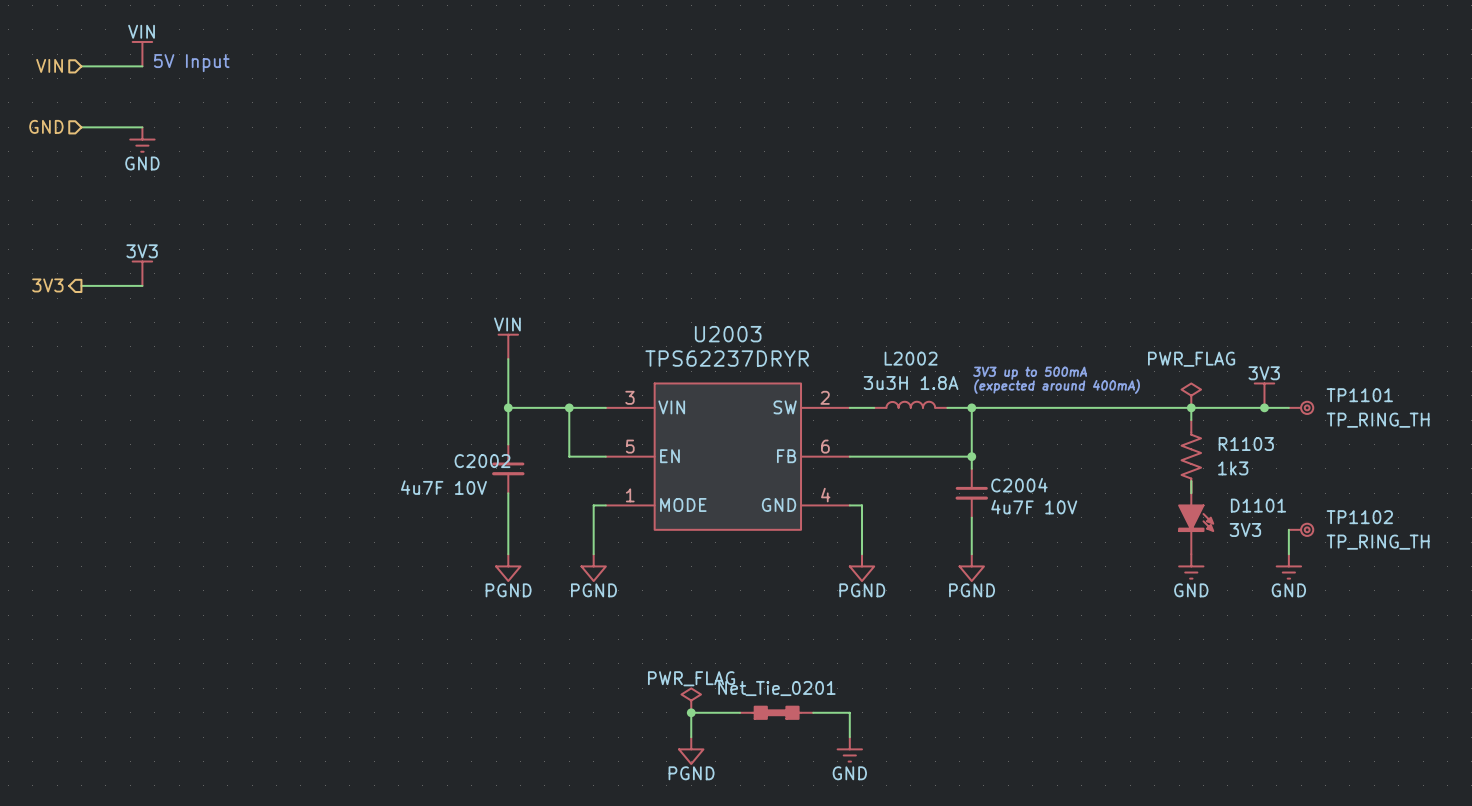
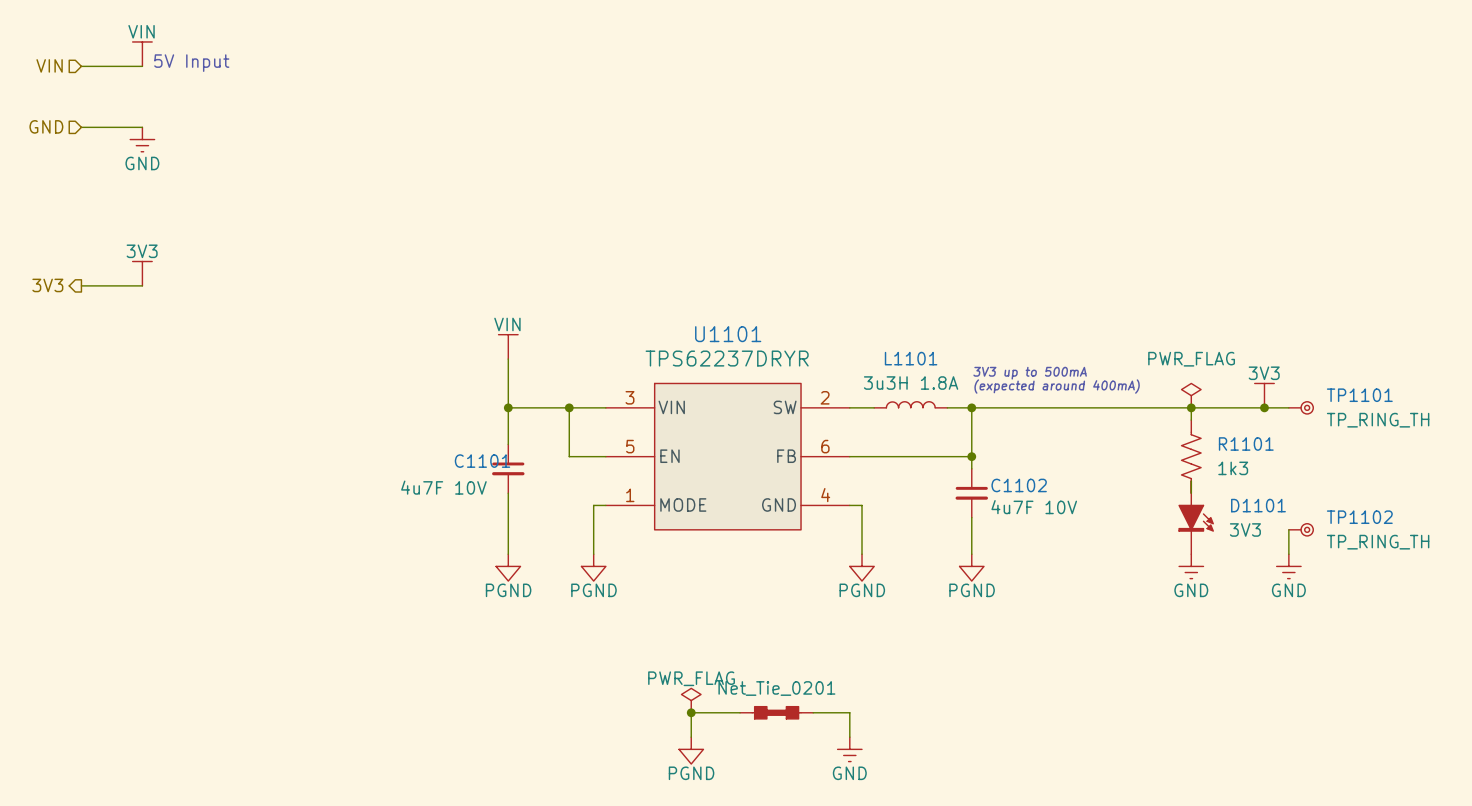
U2003 name: U2003 (728, 334) -> U1101 (728, 334)
L2002 name: L2002 (911, 358) -> L1101 (911, 358)
R1103 name: R1103 (1246, 444) -> R1101 (1246, 444)
C2002 name: C2002 (482, 461) -> C1101 (482, 461)
C2004 name: C2004 (1019, 485) -> C1102 (1019, 485)

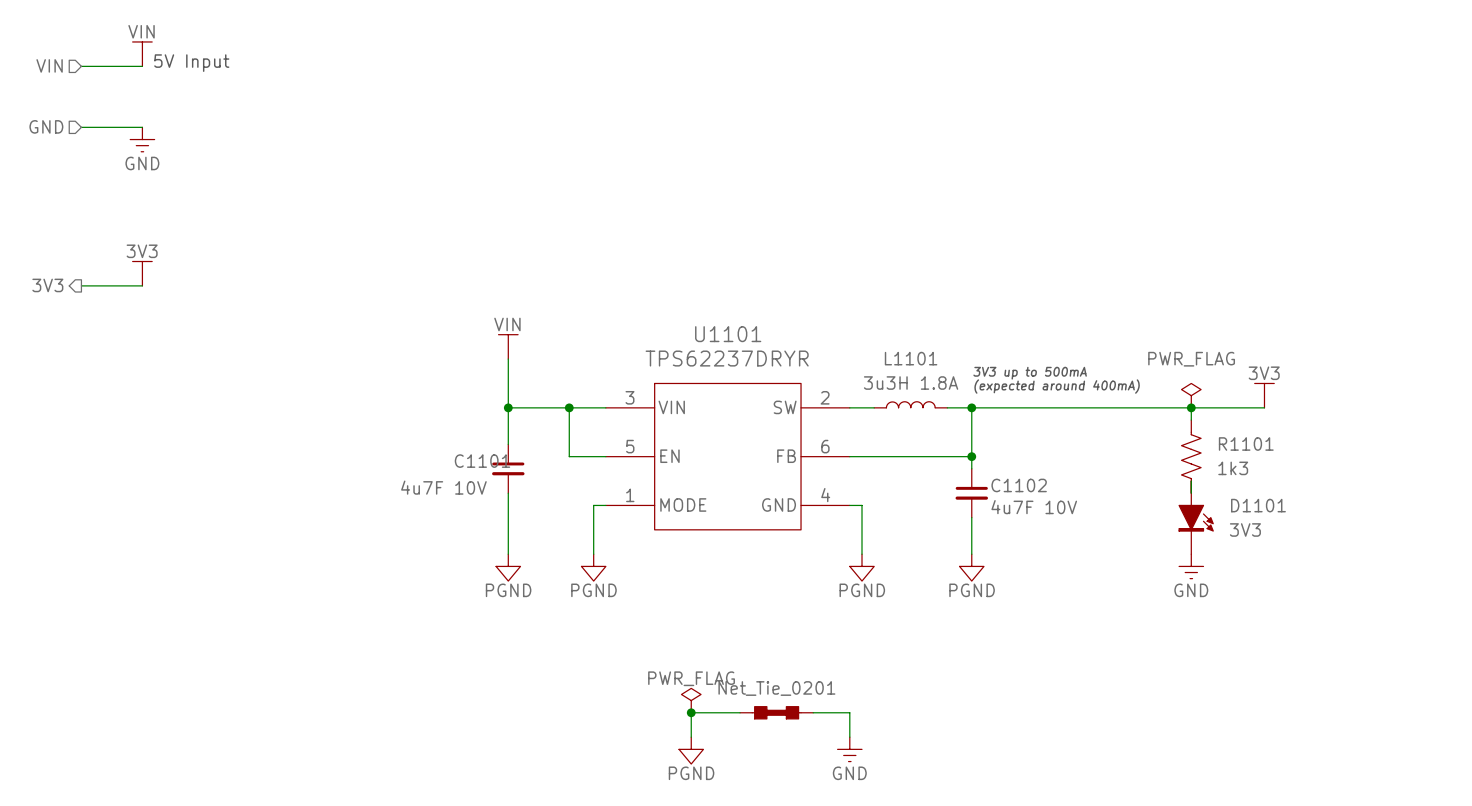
wire: (1264, 407) (1288, 407) -> none
junction: (1264, 407) -> none
TP1101: TP_RING_TH (1301, 407) -> none
wire: (1288, 529) (1288, 554) -> none
TP1102: TP_RING_TH (1301, 529) -> none
power symbol: GND (1288, 566) -> none

